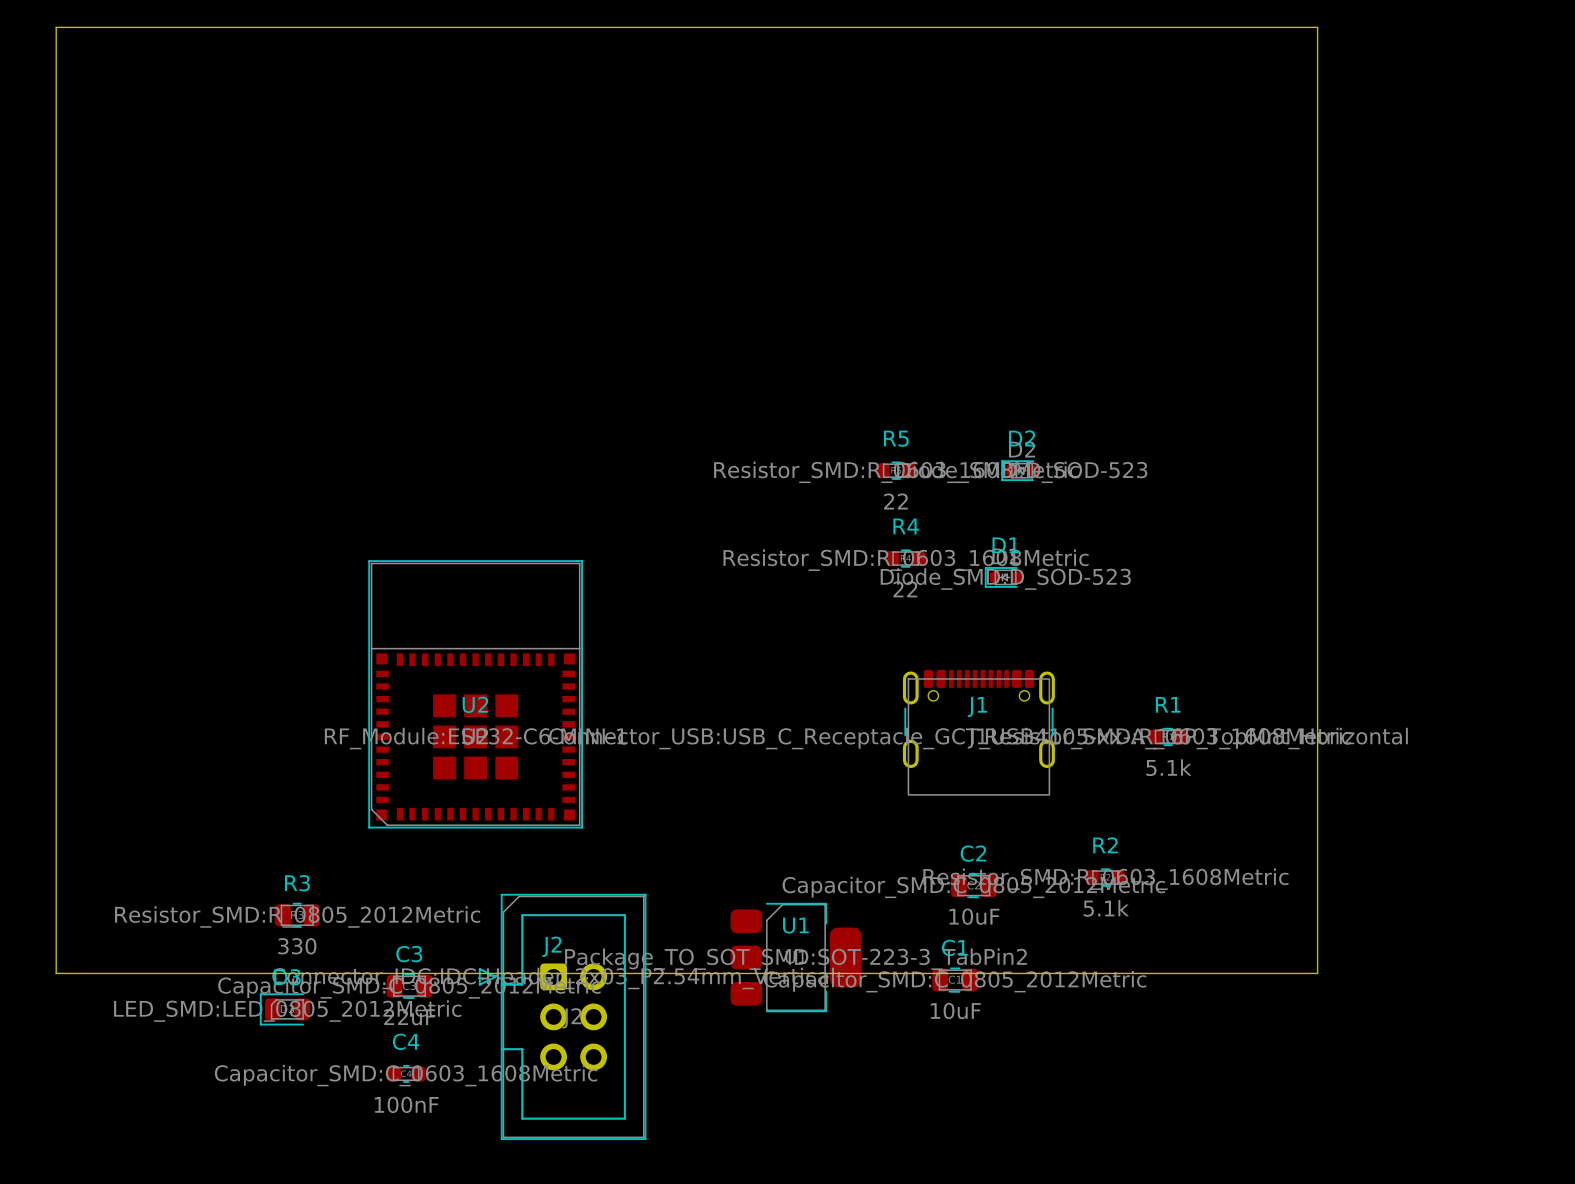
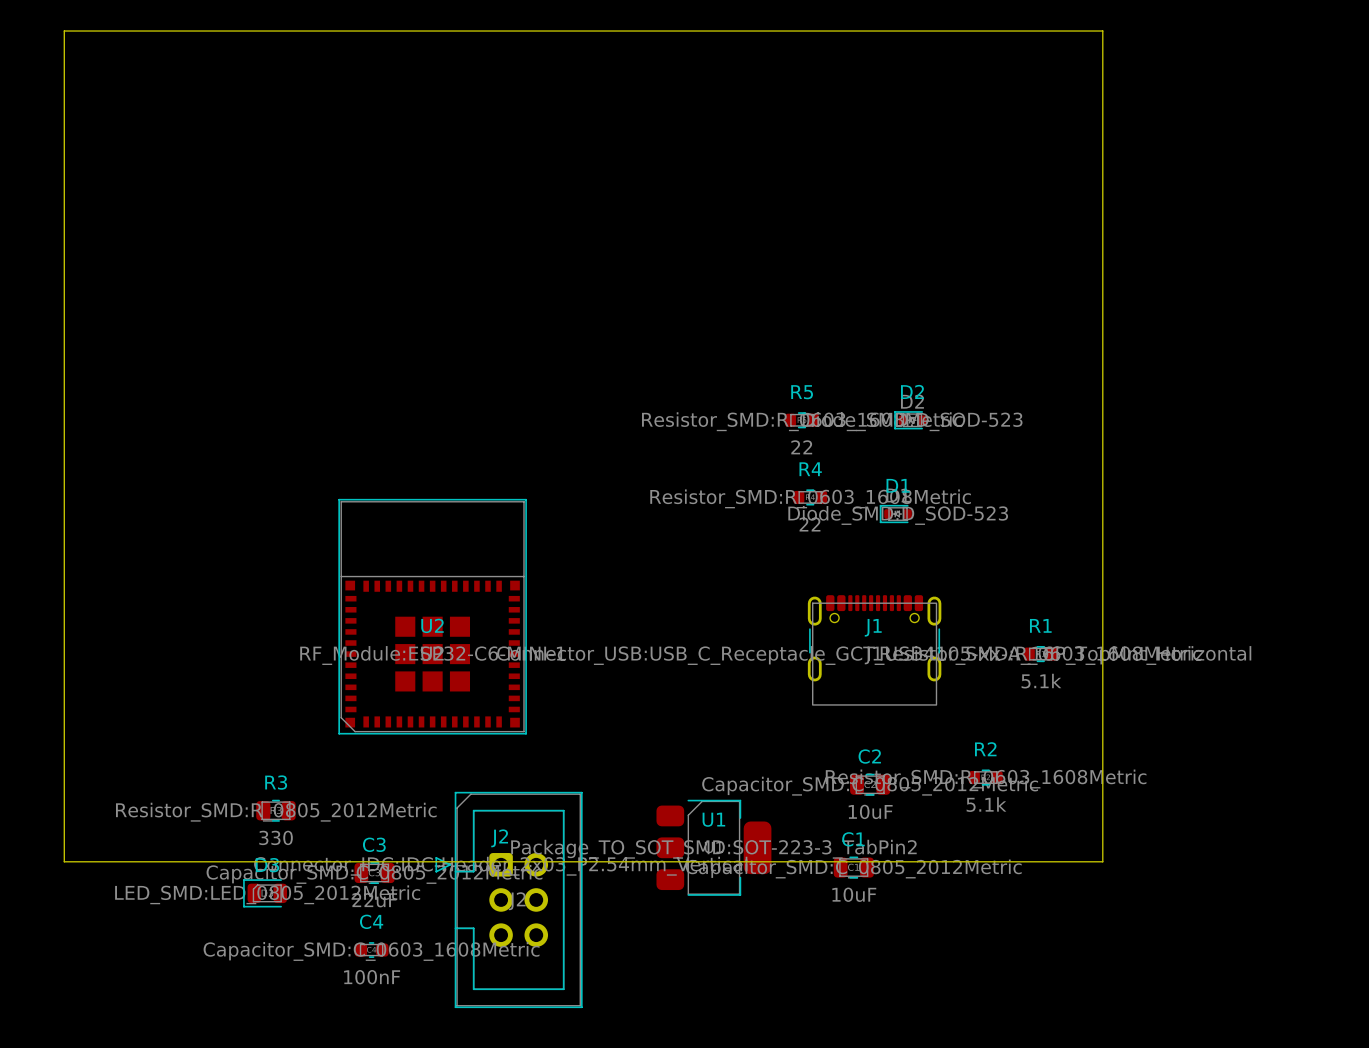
board edge: (1238, 27) (1317, 27) (1317, 973) (1238, 973) -> (1102, 31) (1102, 861)

